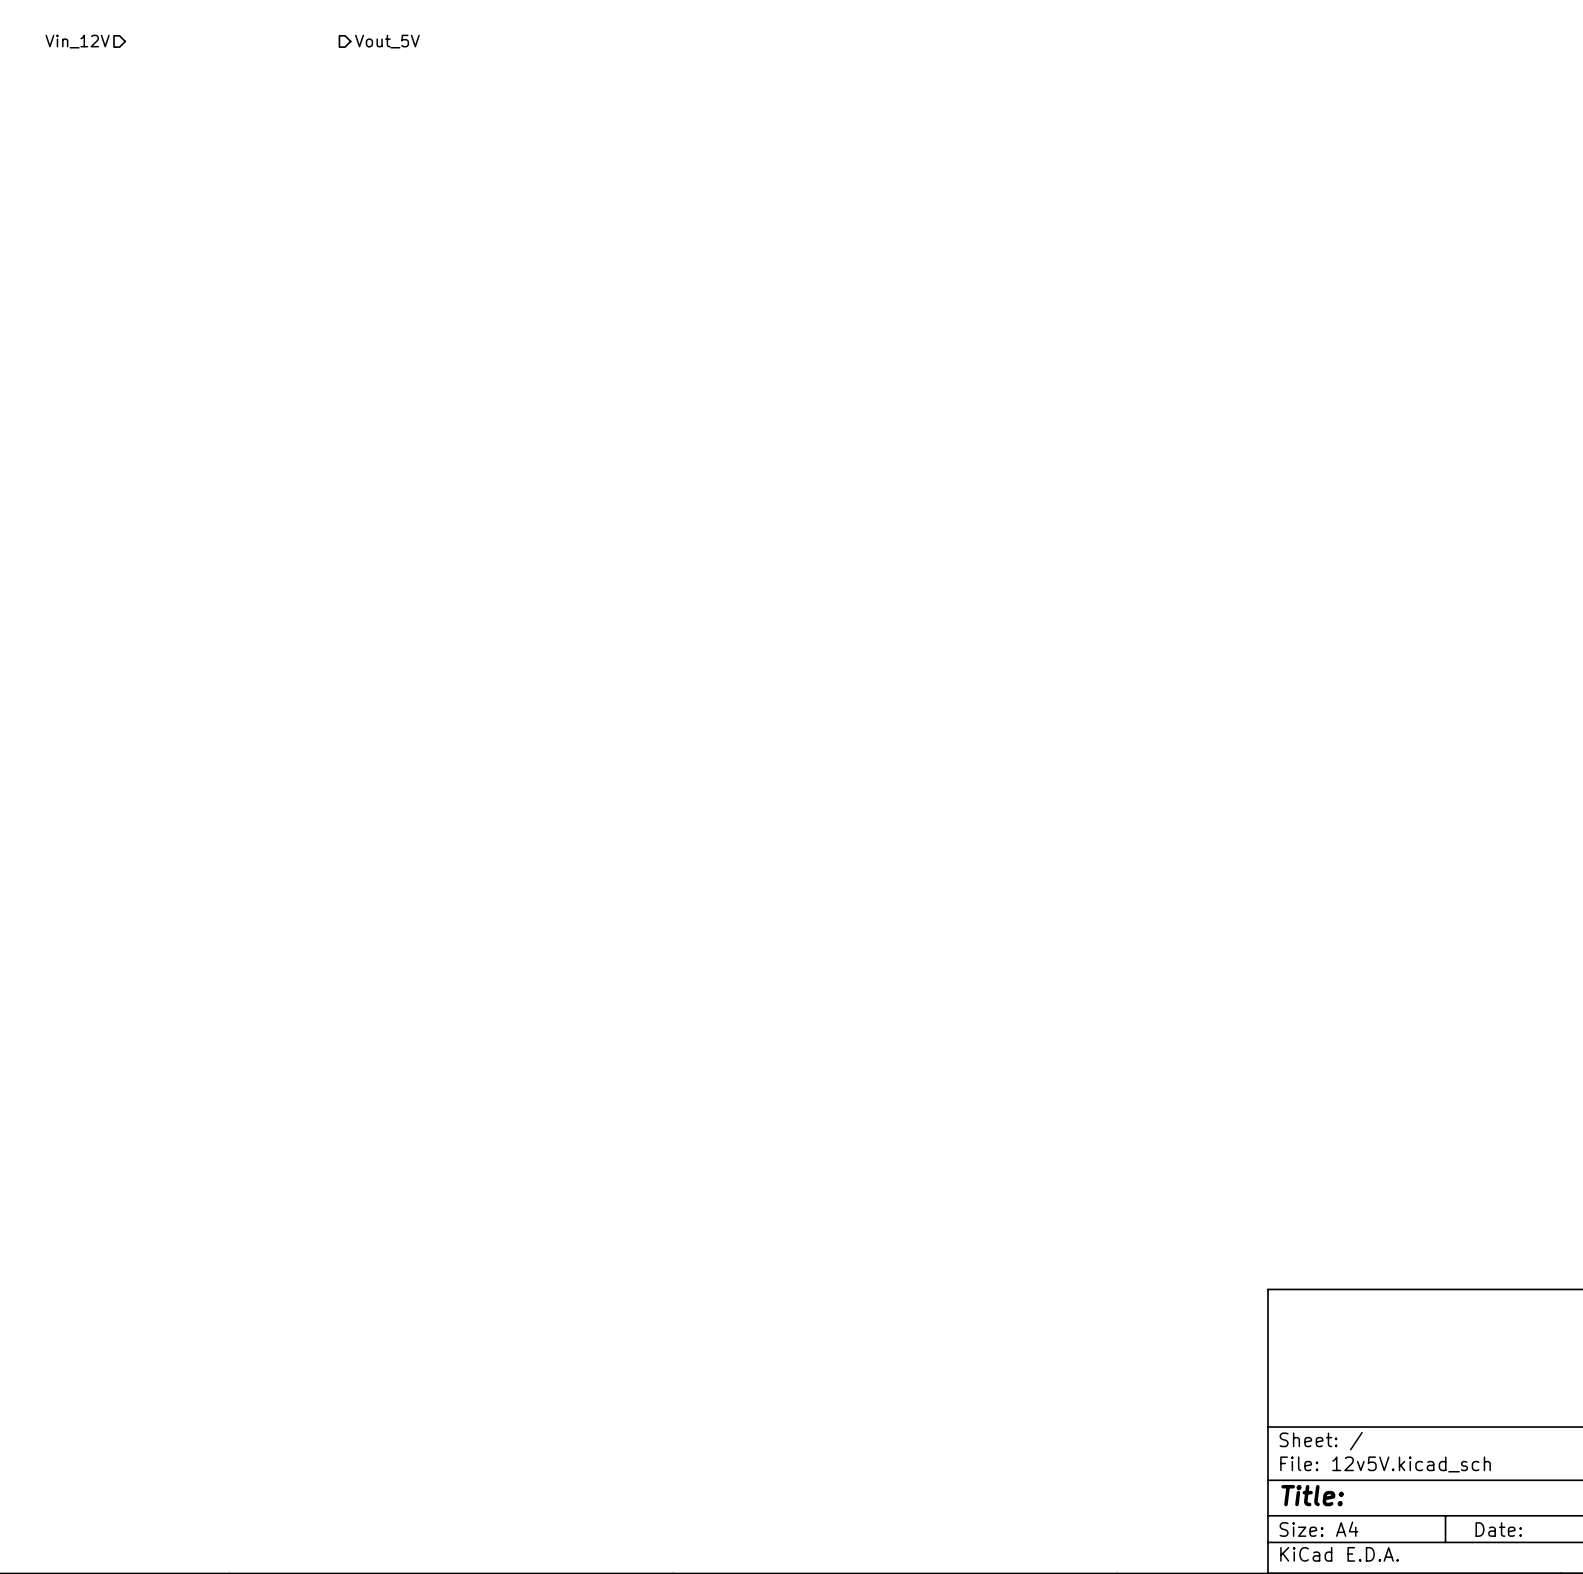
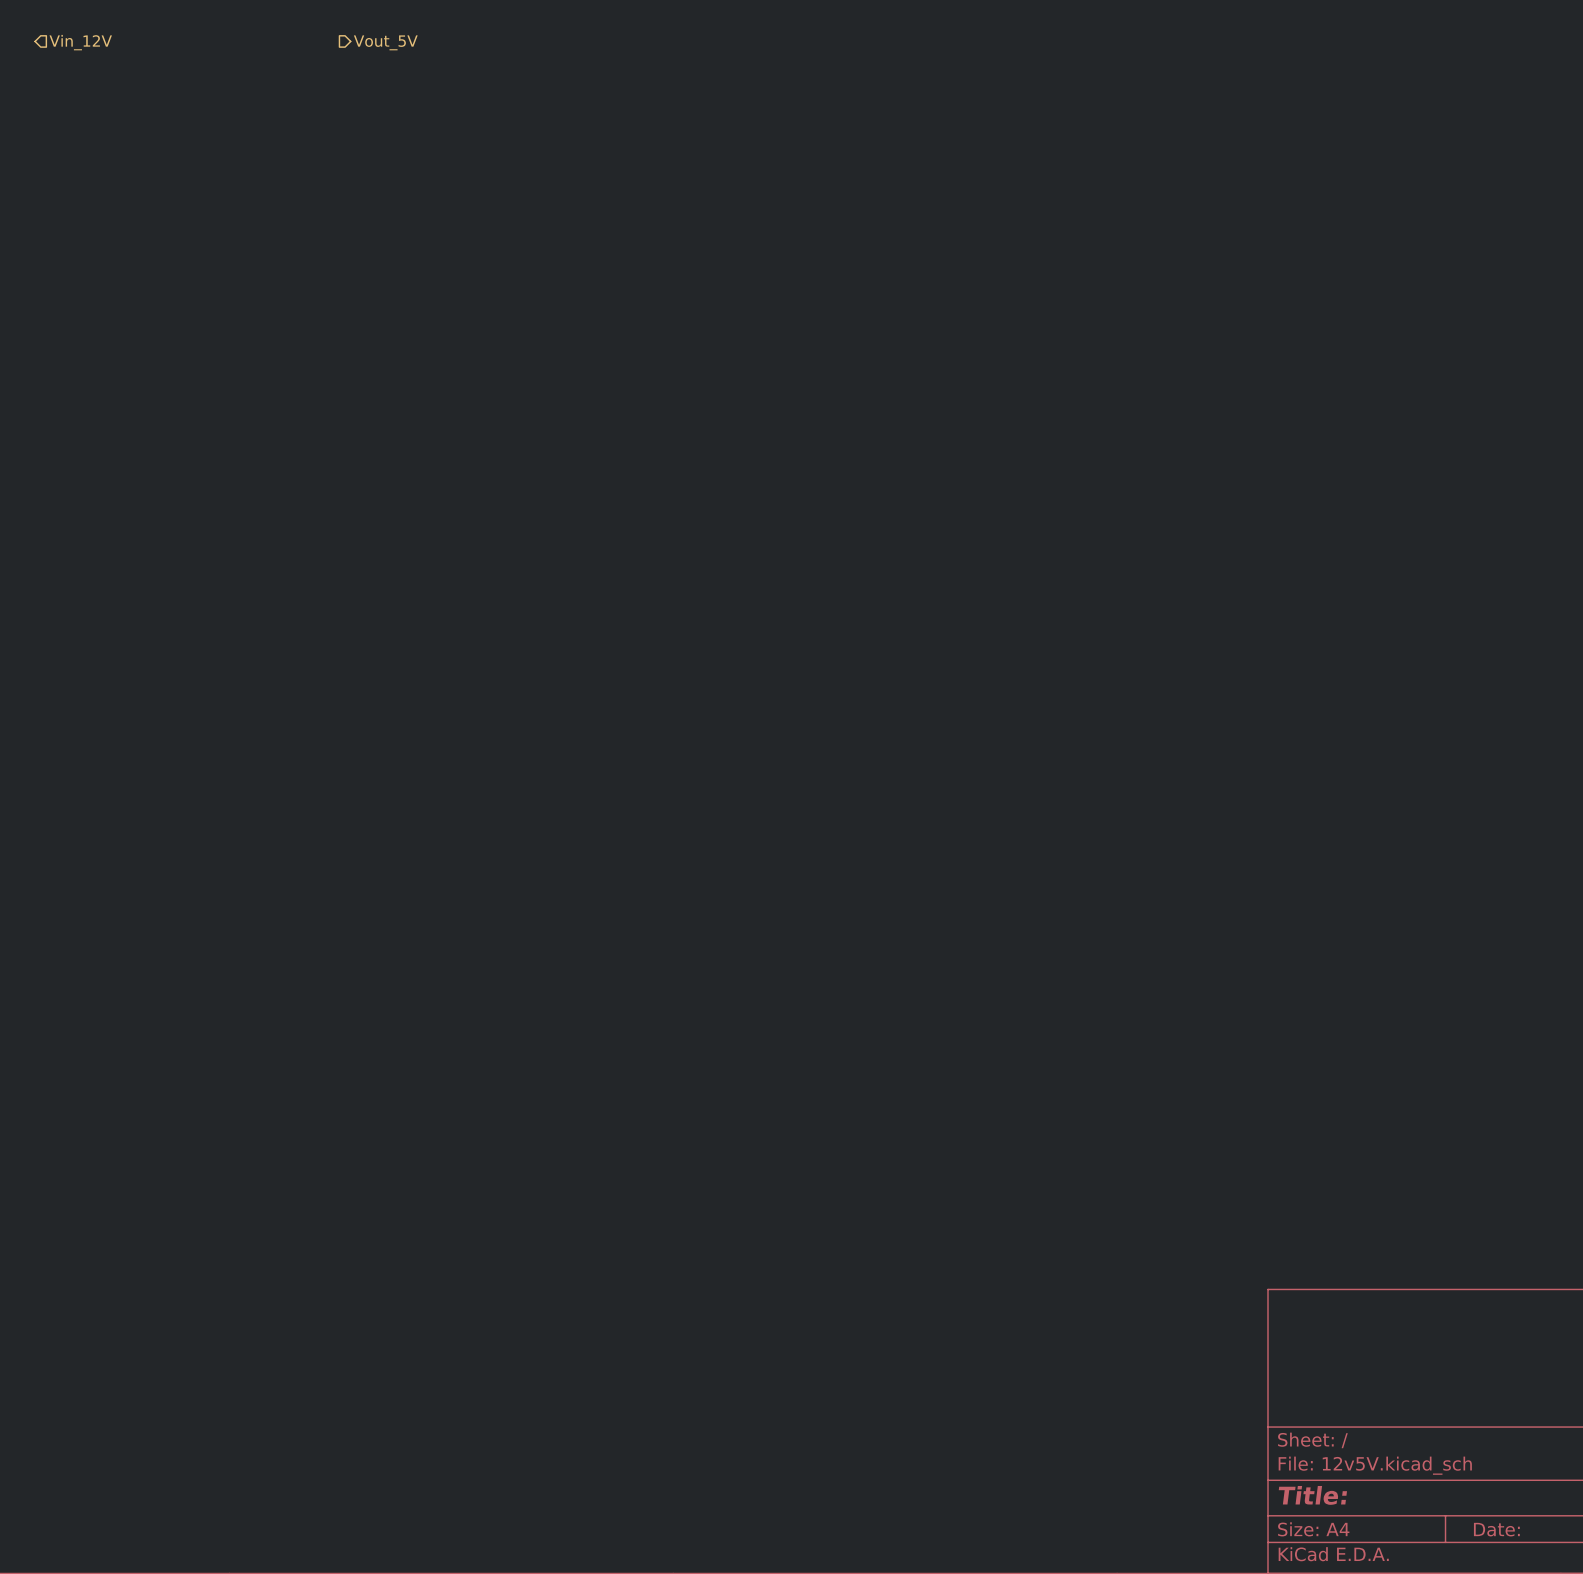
hierarchical label rotation: 0° (77, 41) -> 180° (80, 42)

